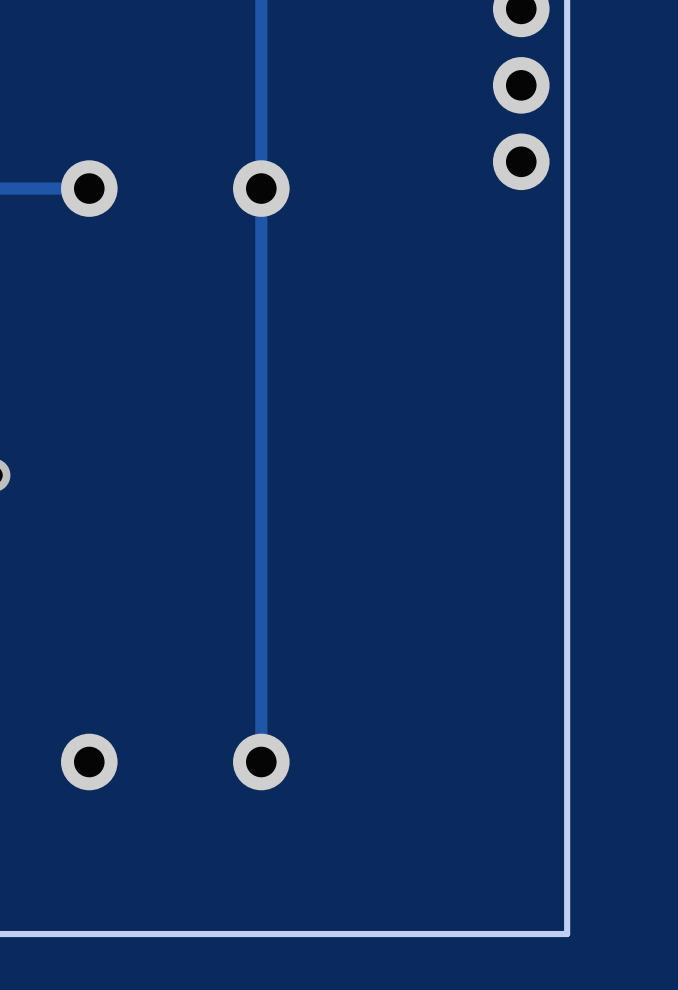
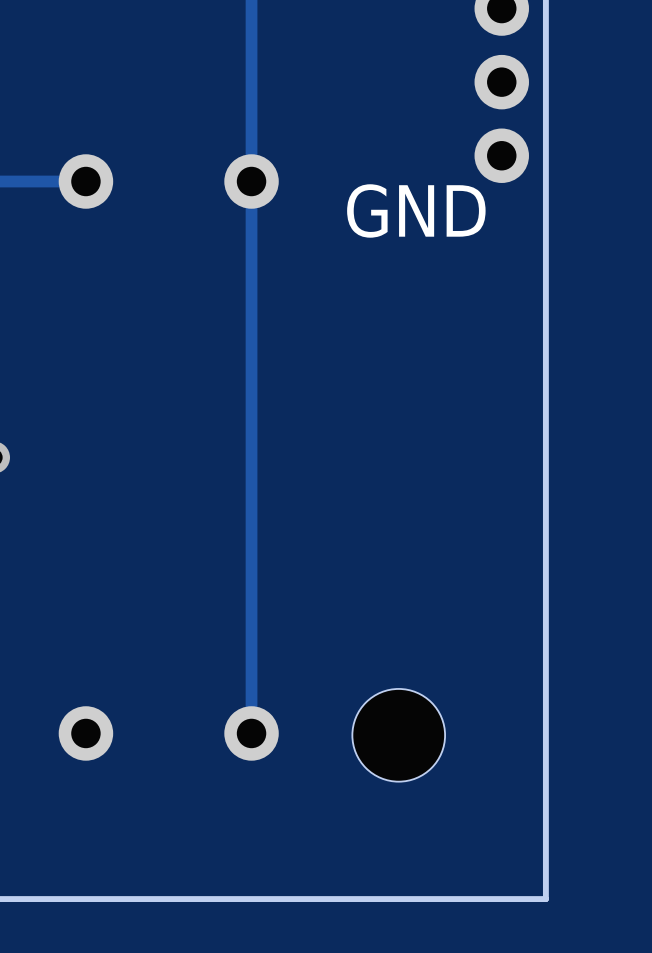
text: none -> GND (416, 210)
hole: none -> (398, 735)

